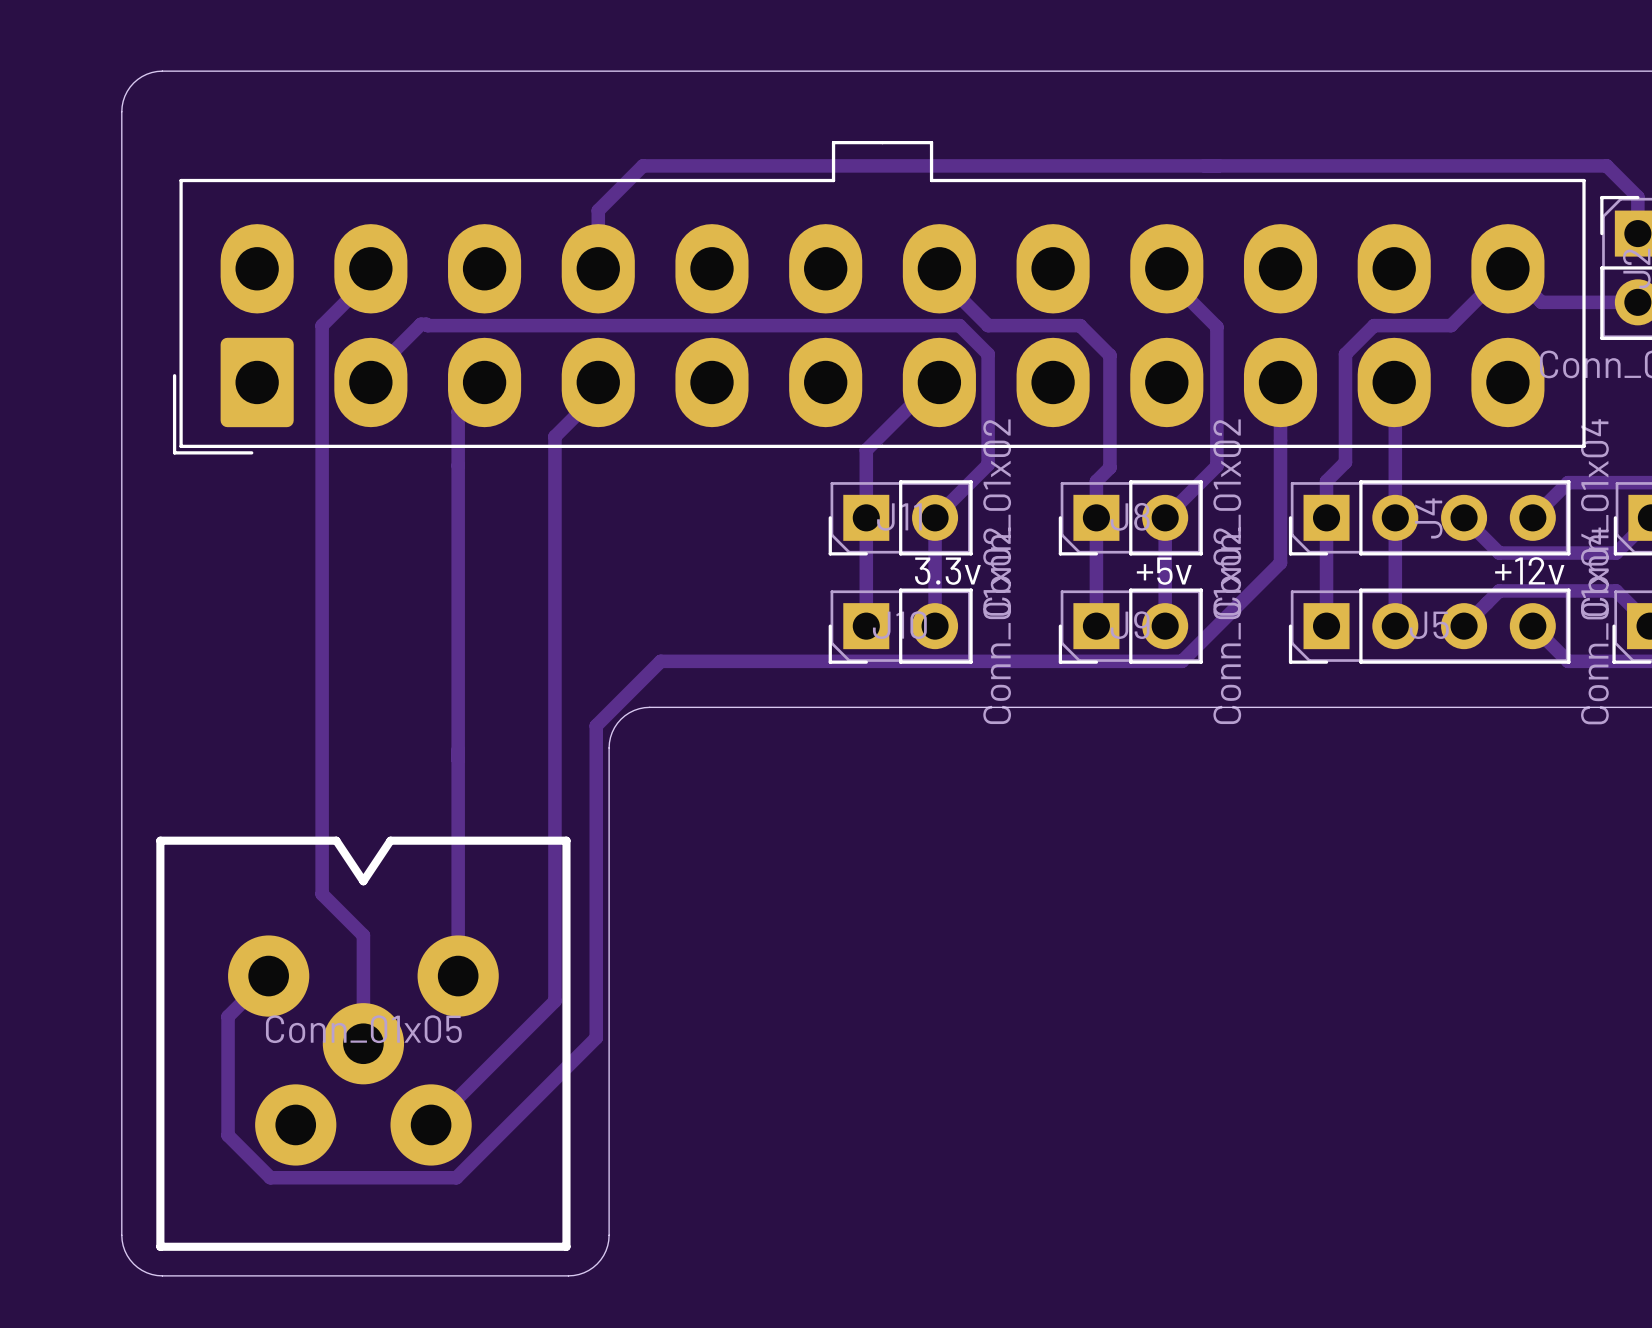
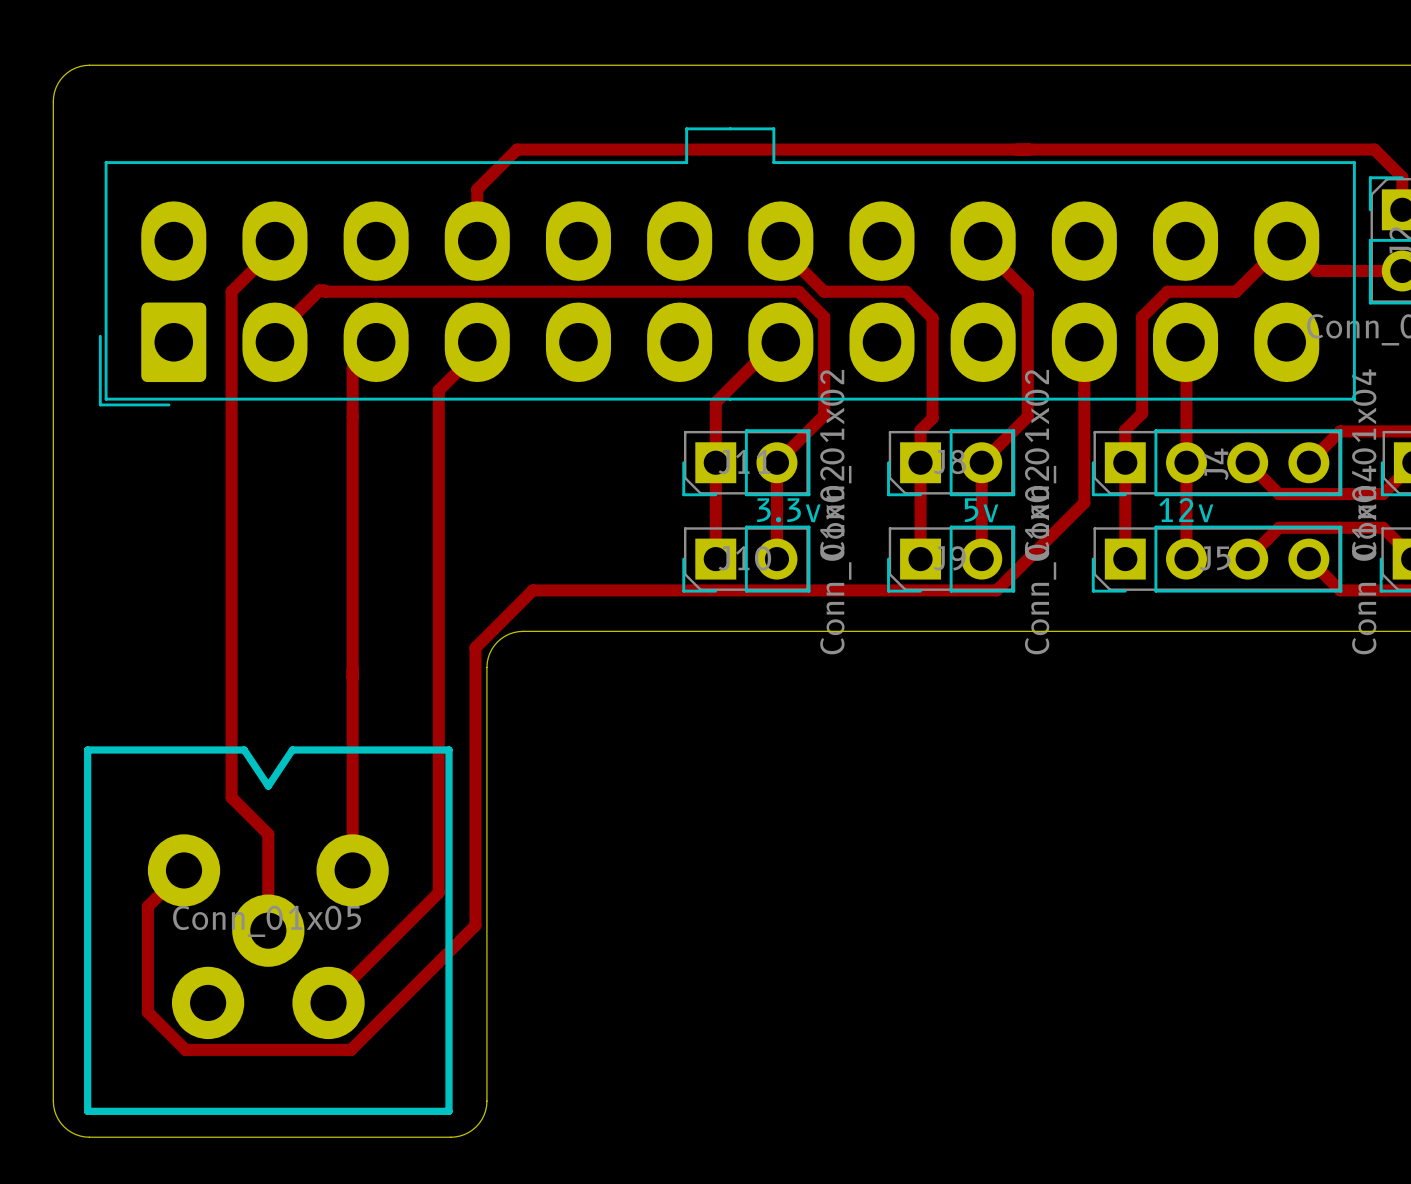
text: none -> 12v (1186, 510)
text: +12v (1529, 570) -> none
text: +5v (1164, 571) -> 5v (981, 510)

